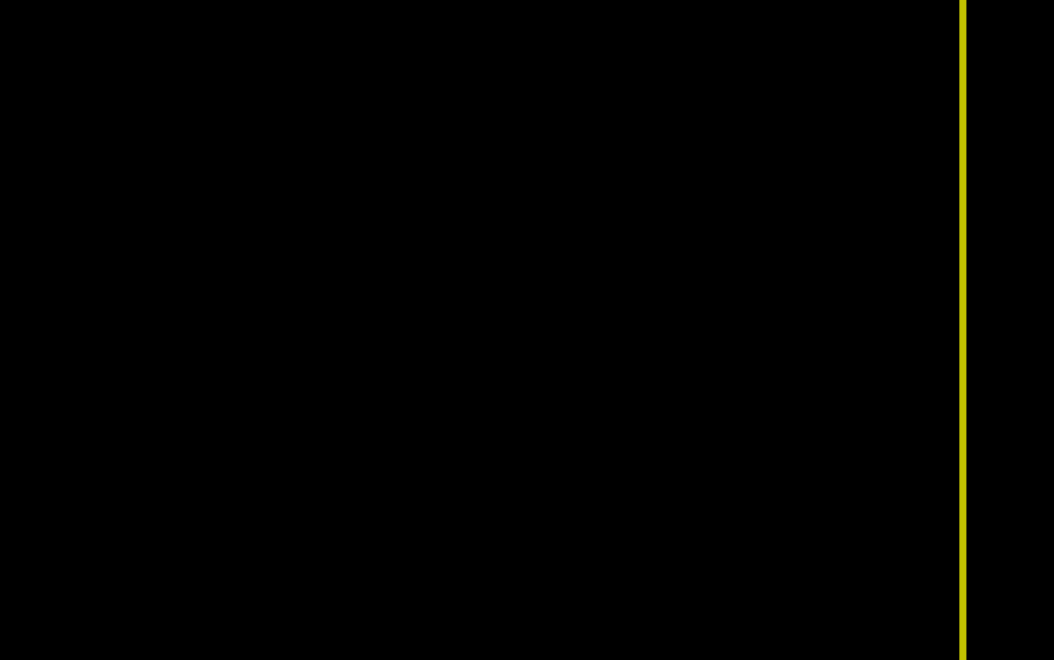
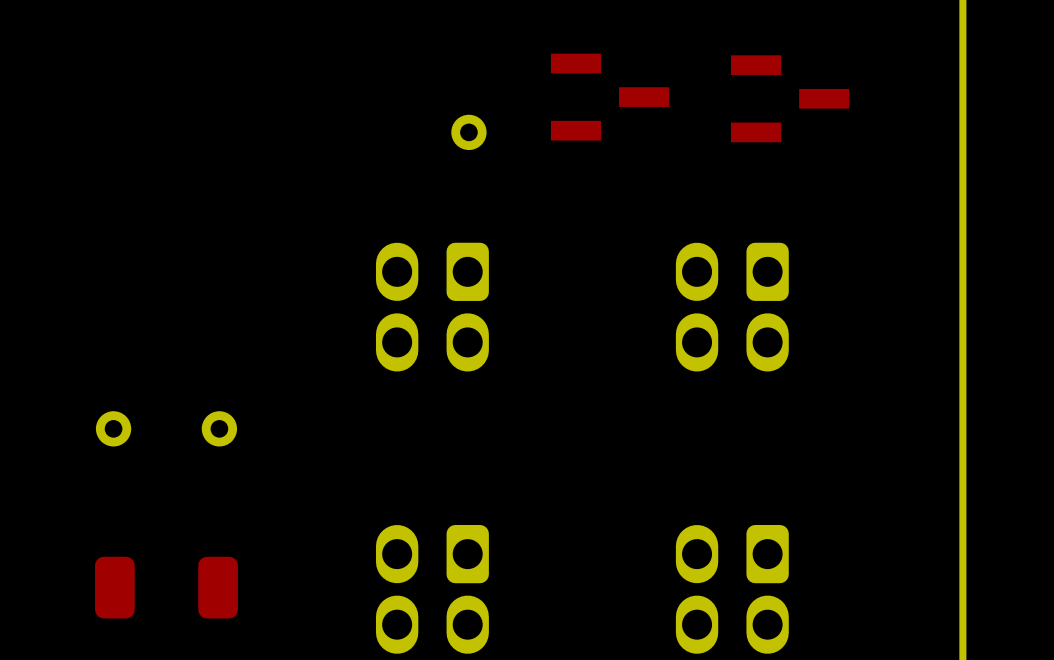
part: none -> (610, 97)
part: none -> (790, 98)
part: none -> (468, 132)
part: none -> (432, 307)
part: none -> (732, 307)
part: none -> (113, 428)
part: none -> (219, 428)
part: none -> (166, 587)
part: none -> (432, 589)
part: none -> (732, 589)

